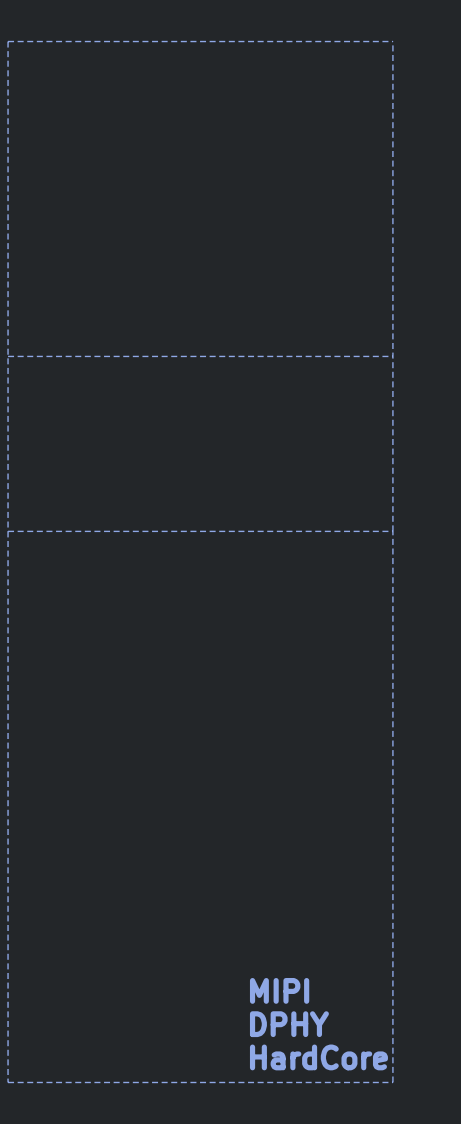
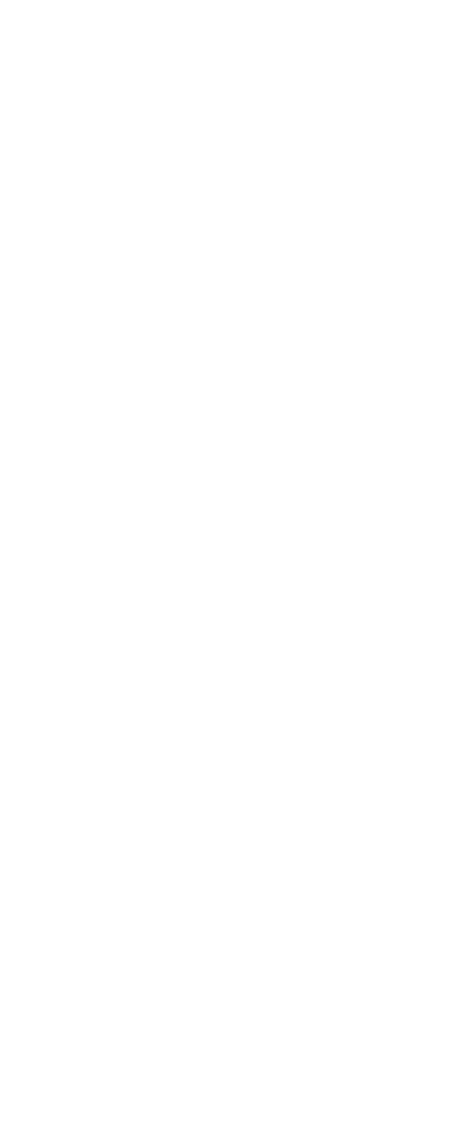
line: (8, 41) (8, 1082) (392, 1082) (392, 41) (8, 41) -> none
line: (8, 356) (392, 356) -> none
line: (8, 531) (392, 531) -> none
text: MIPI (279, 990) -> none
text: DPHY (289, 1024) -> none
text: HardCore (318, 1057) -> none

